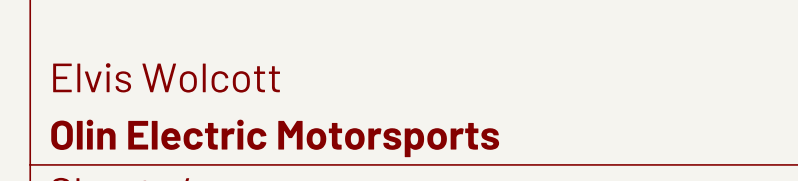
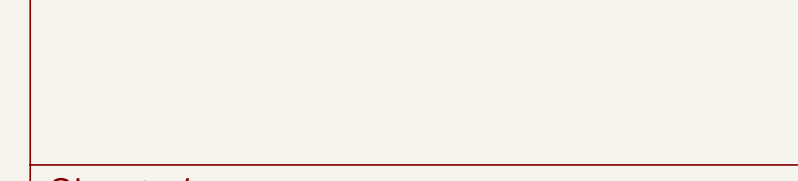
title block: Elvis Wolcott (166, 77) -> none
title block: Olin Electric Motorsports (275, 138) -> none

